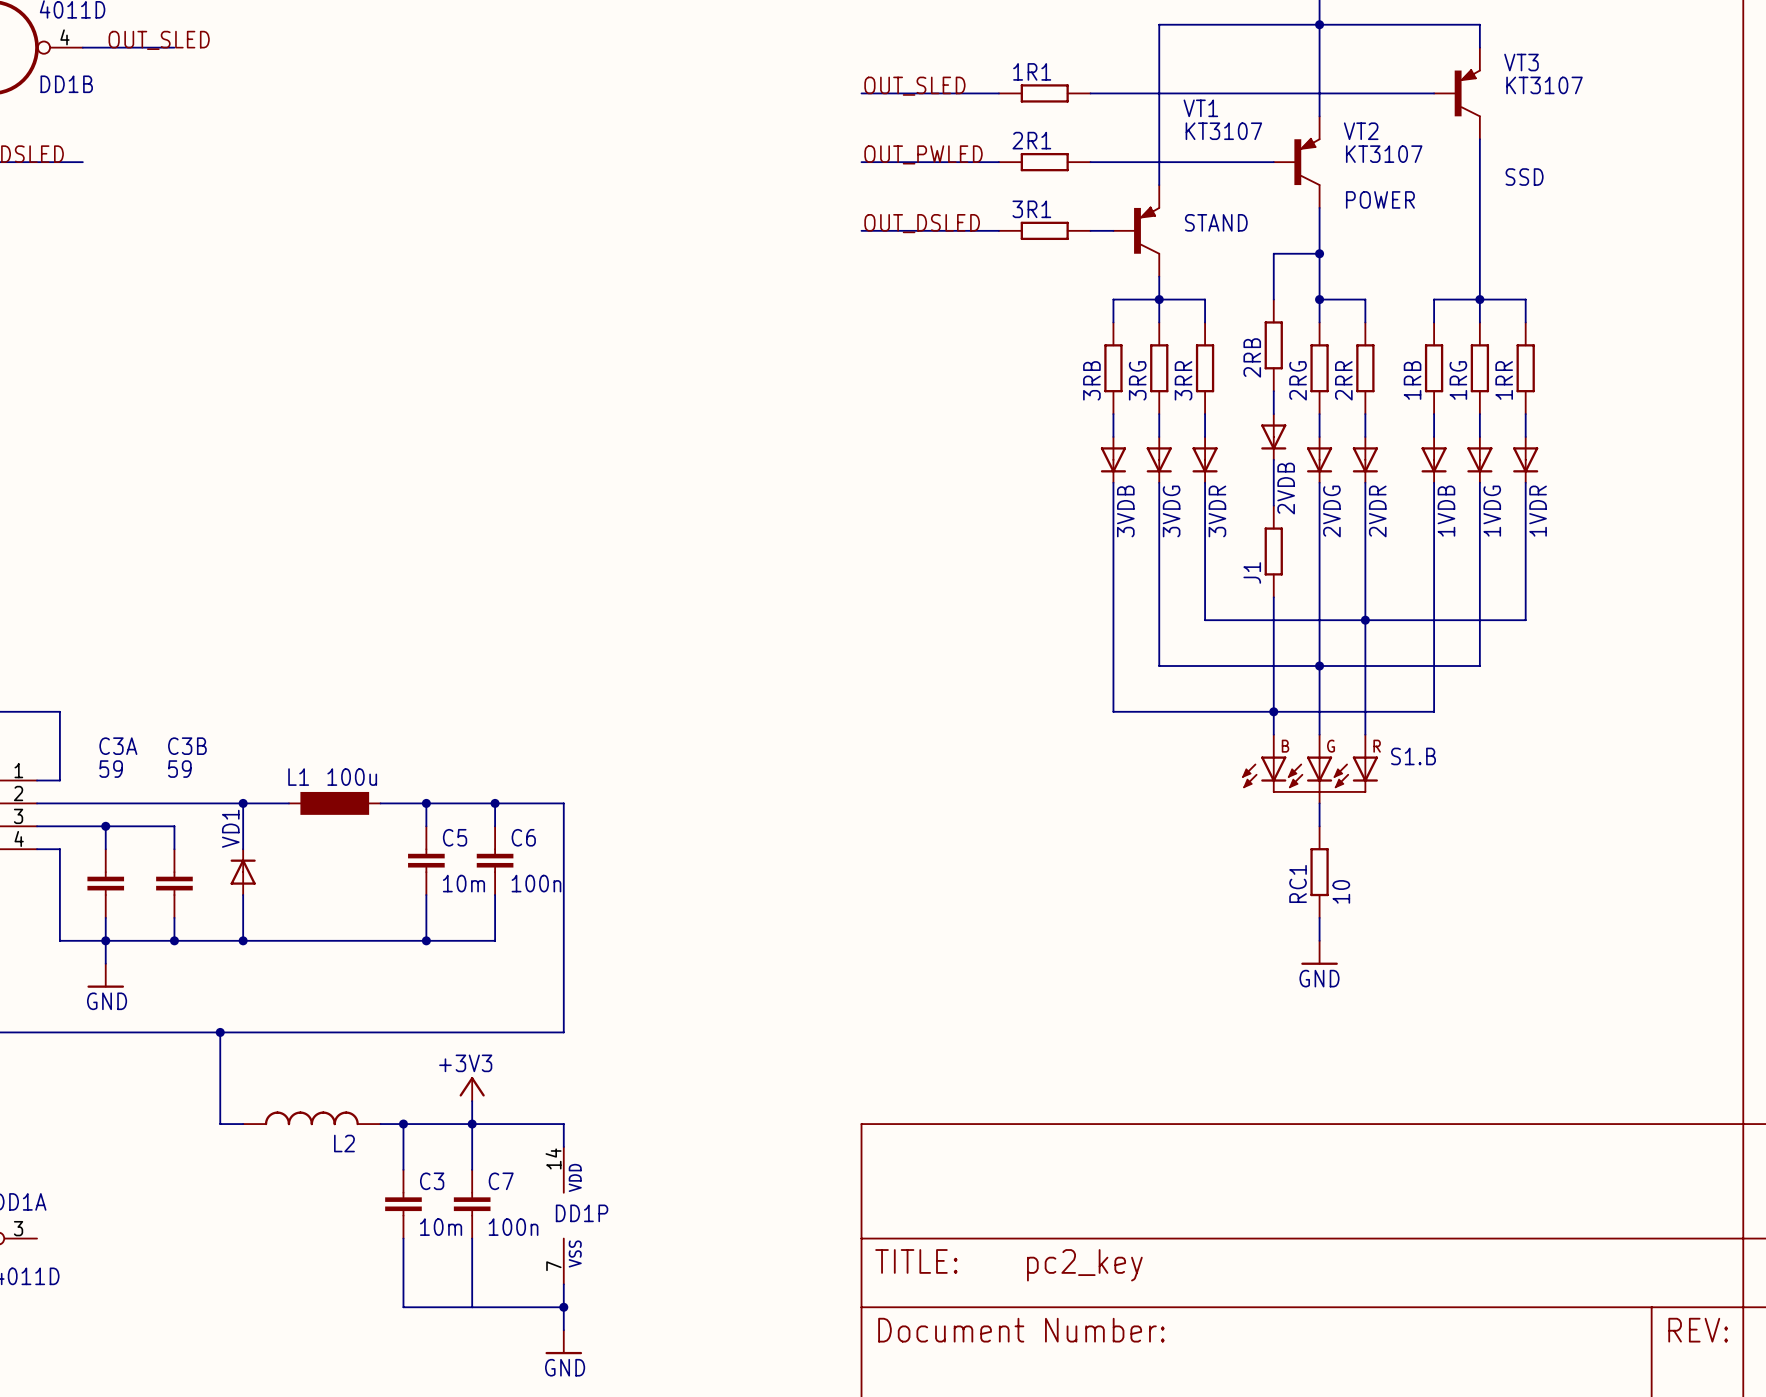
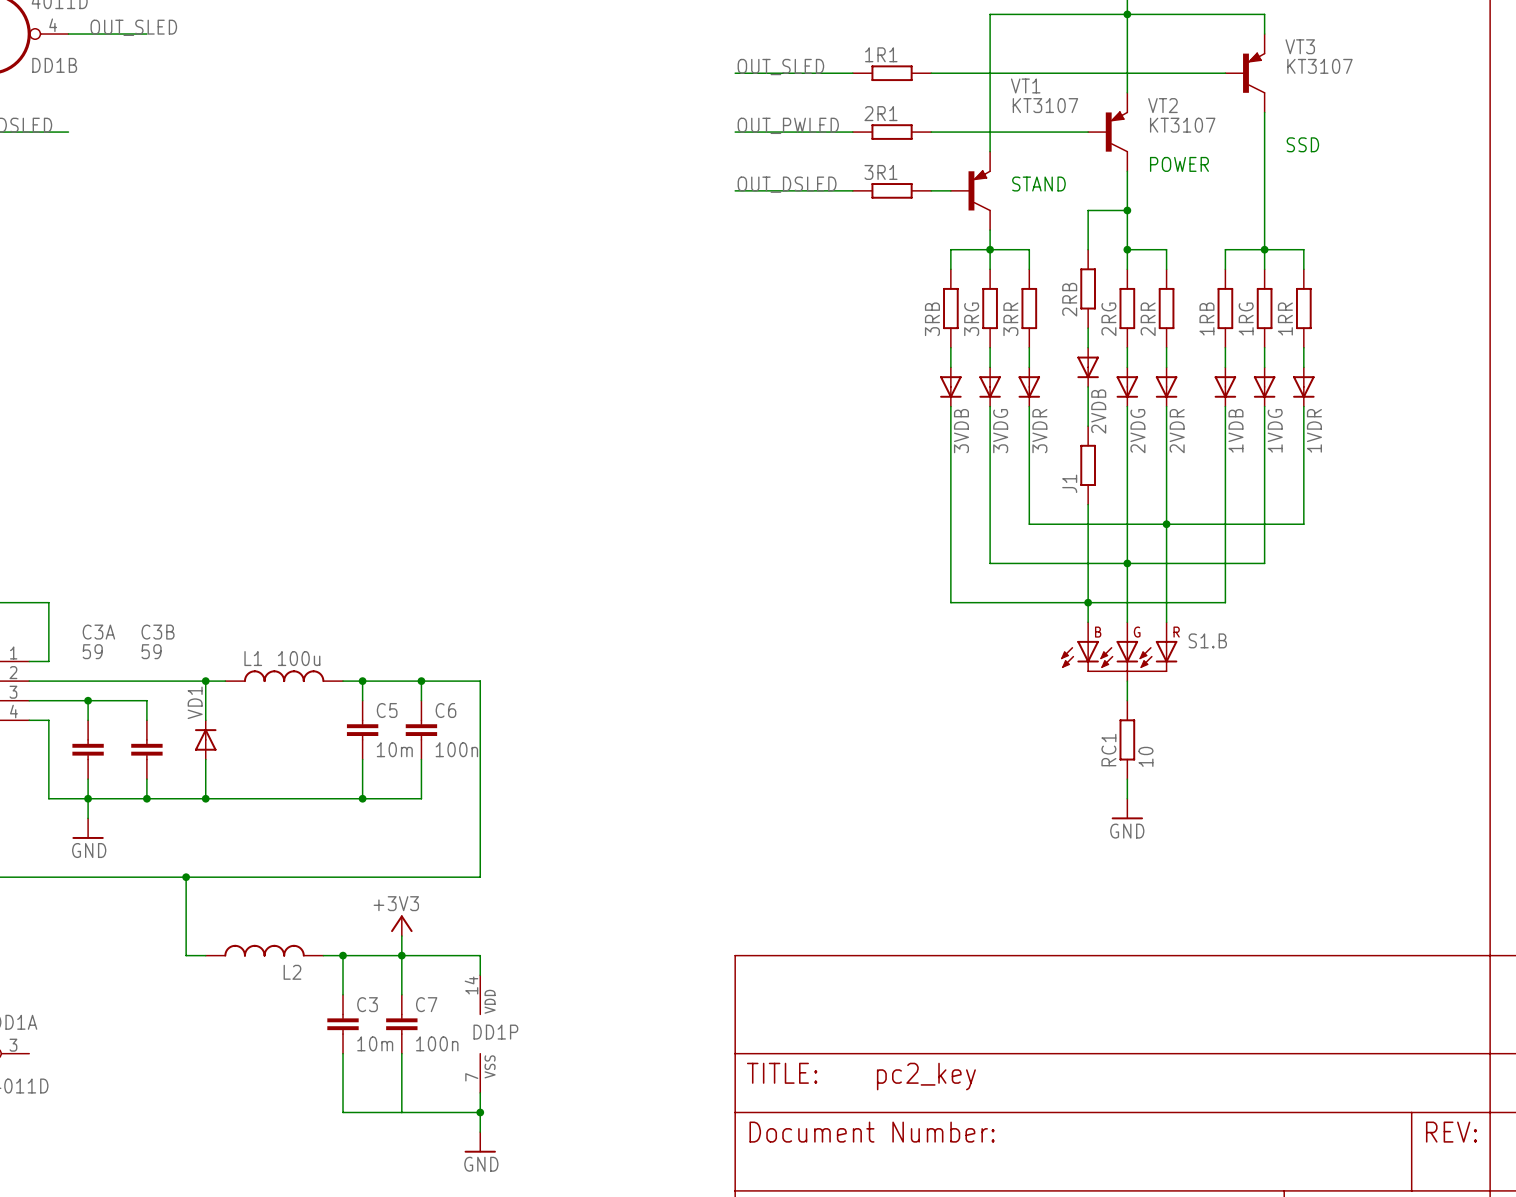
L1 symbol: [288, 791, 381, 815] -> [225, 670, 344, 683]

